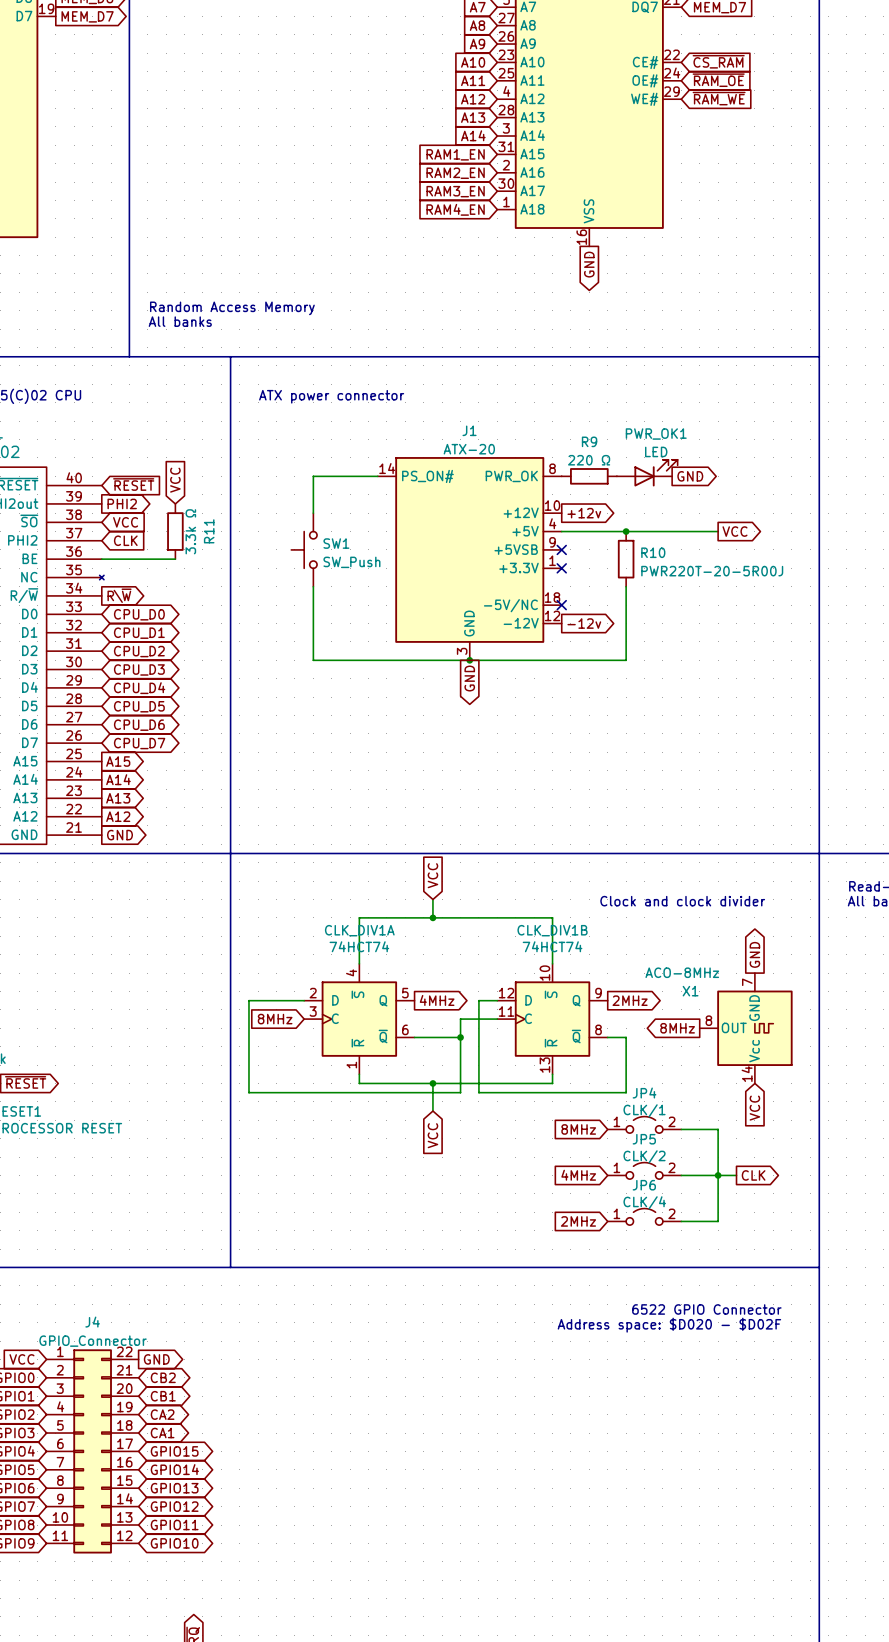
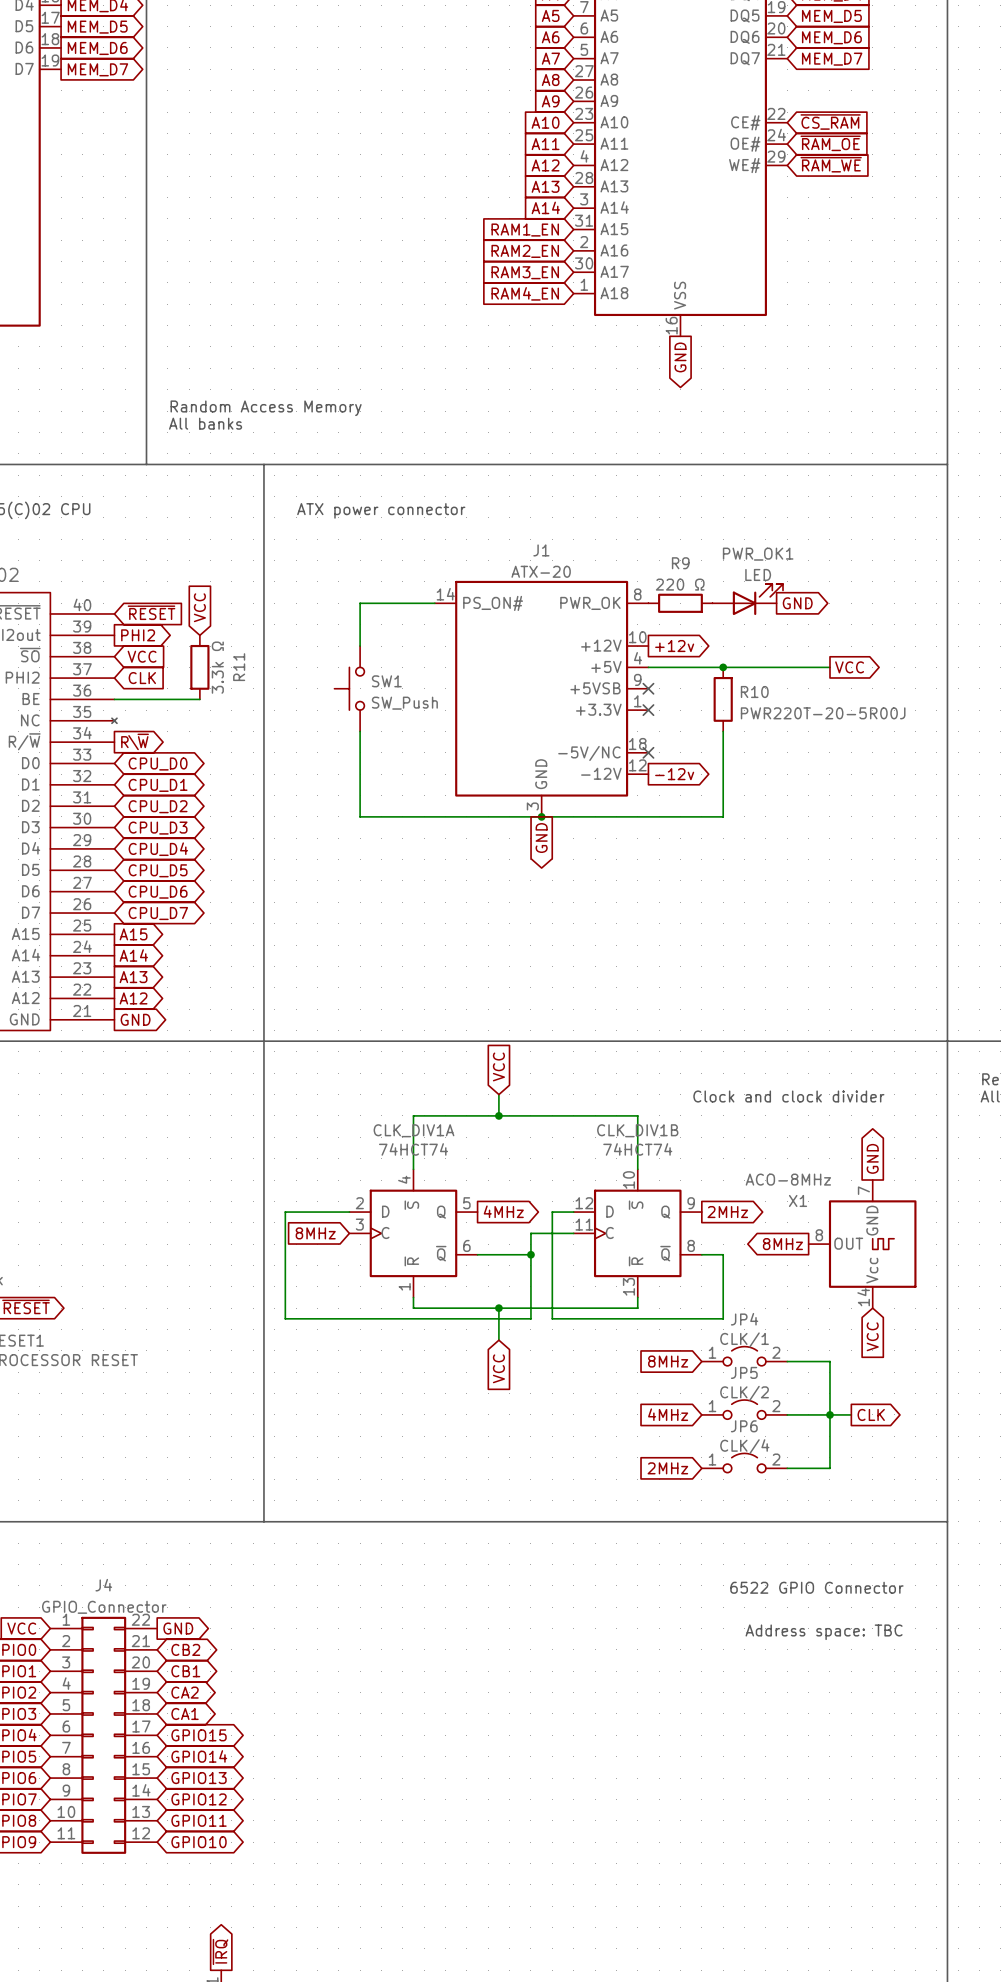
text: 6522 GPIO Connector (706, 1309) -> none
text: Address space: $D020 - $D02F (669, 1325) -> 6522 GPIO Connector (816, 1587)
text: none -> Address space: TBC (824, 1632)

